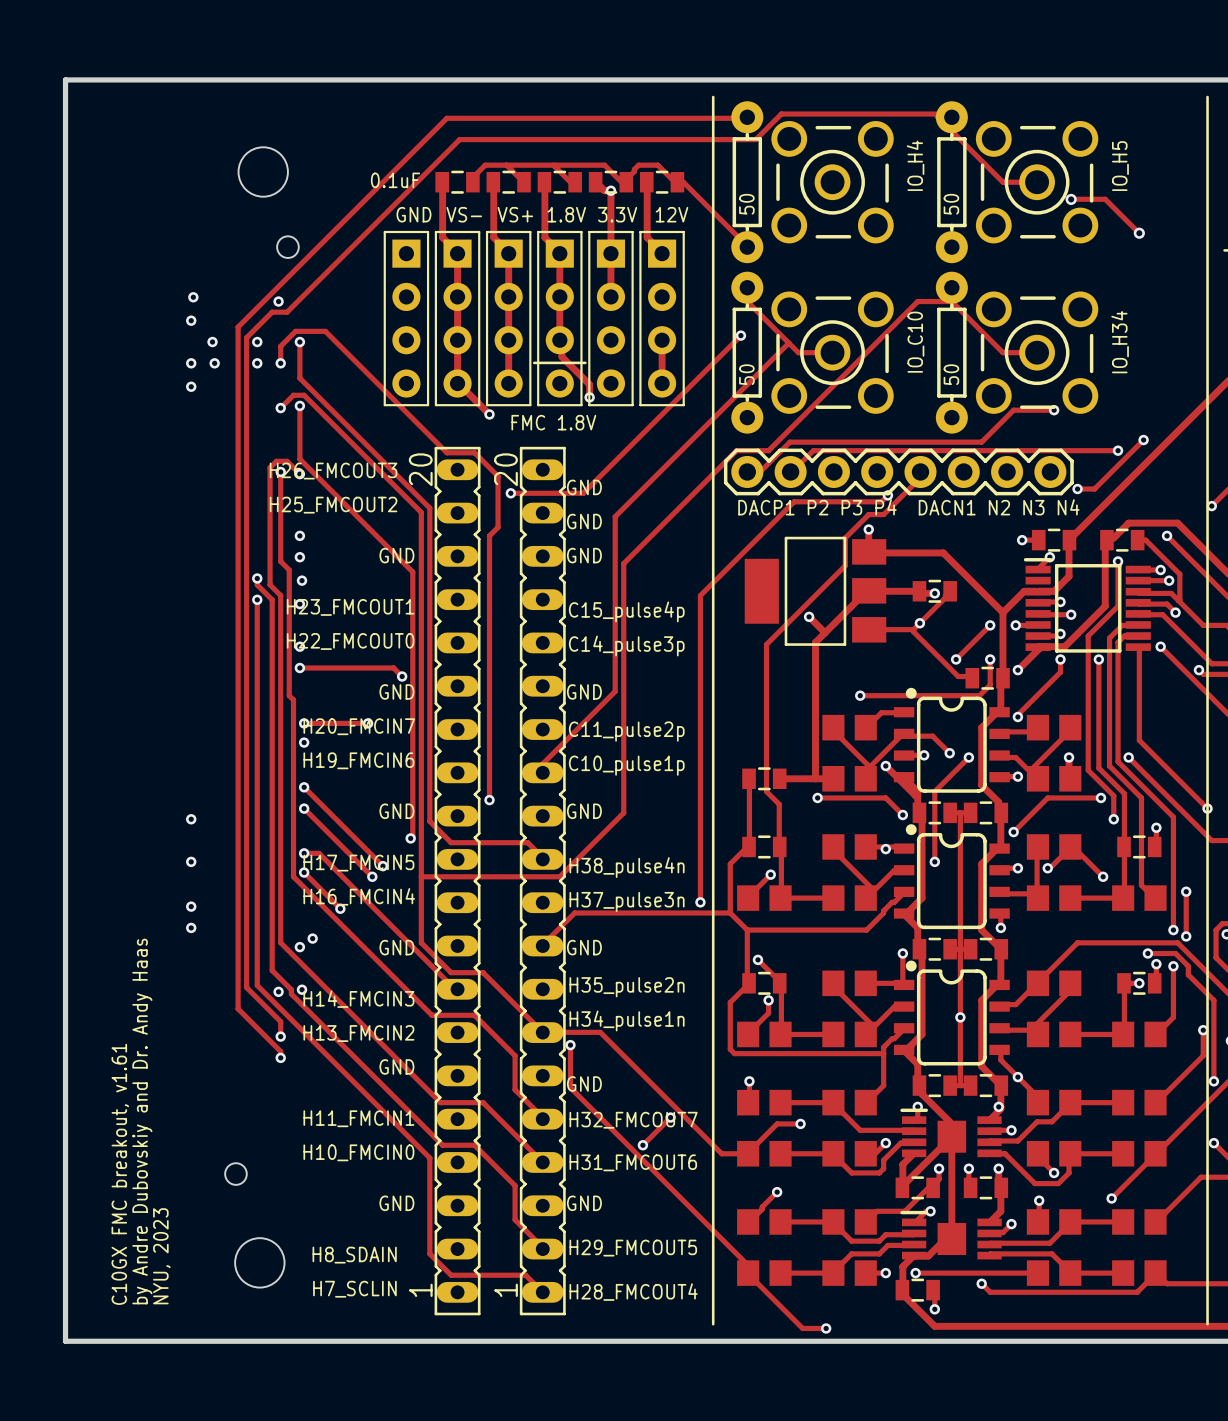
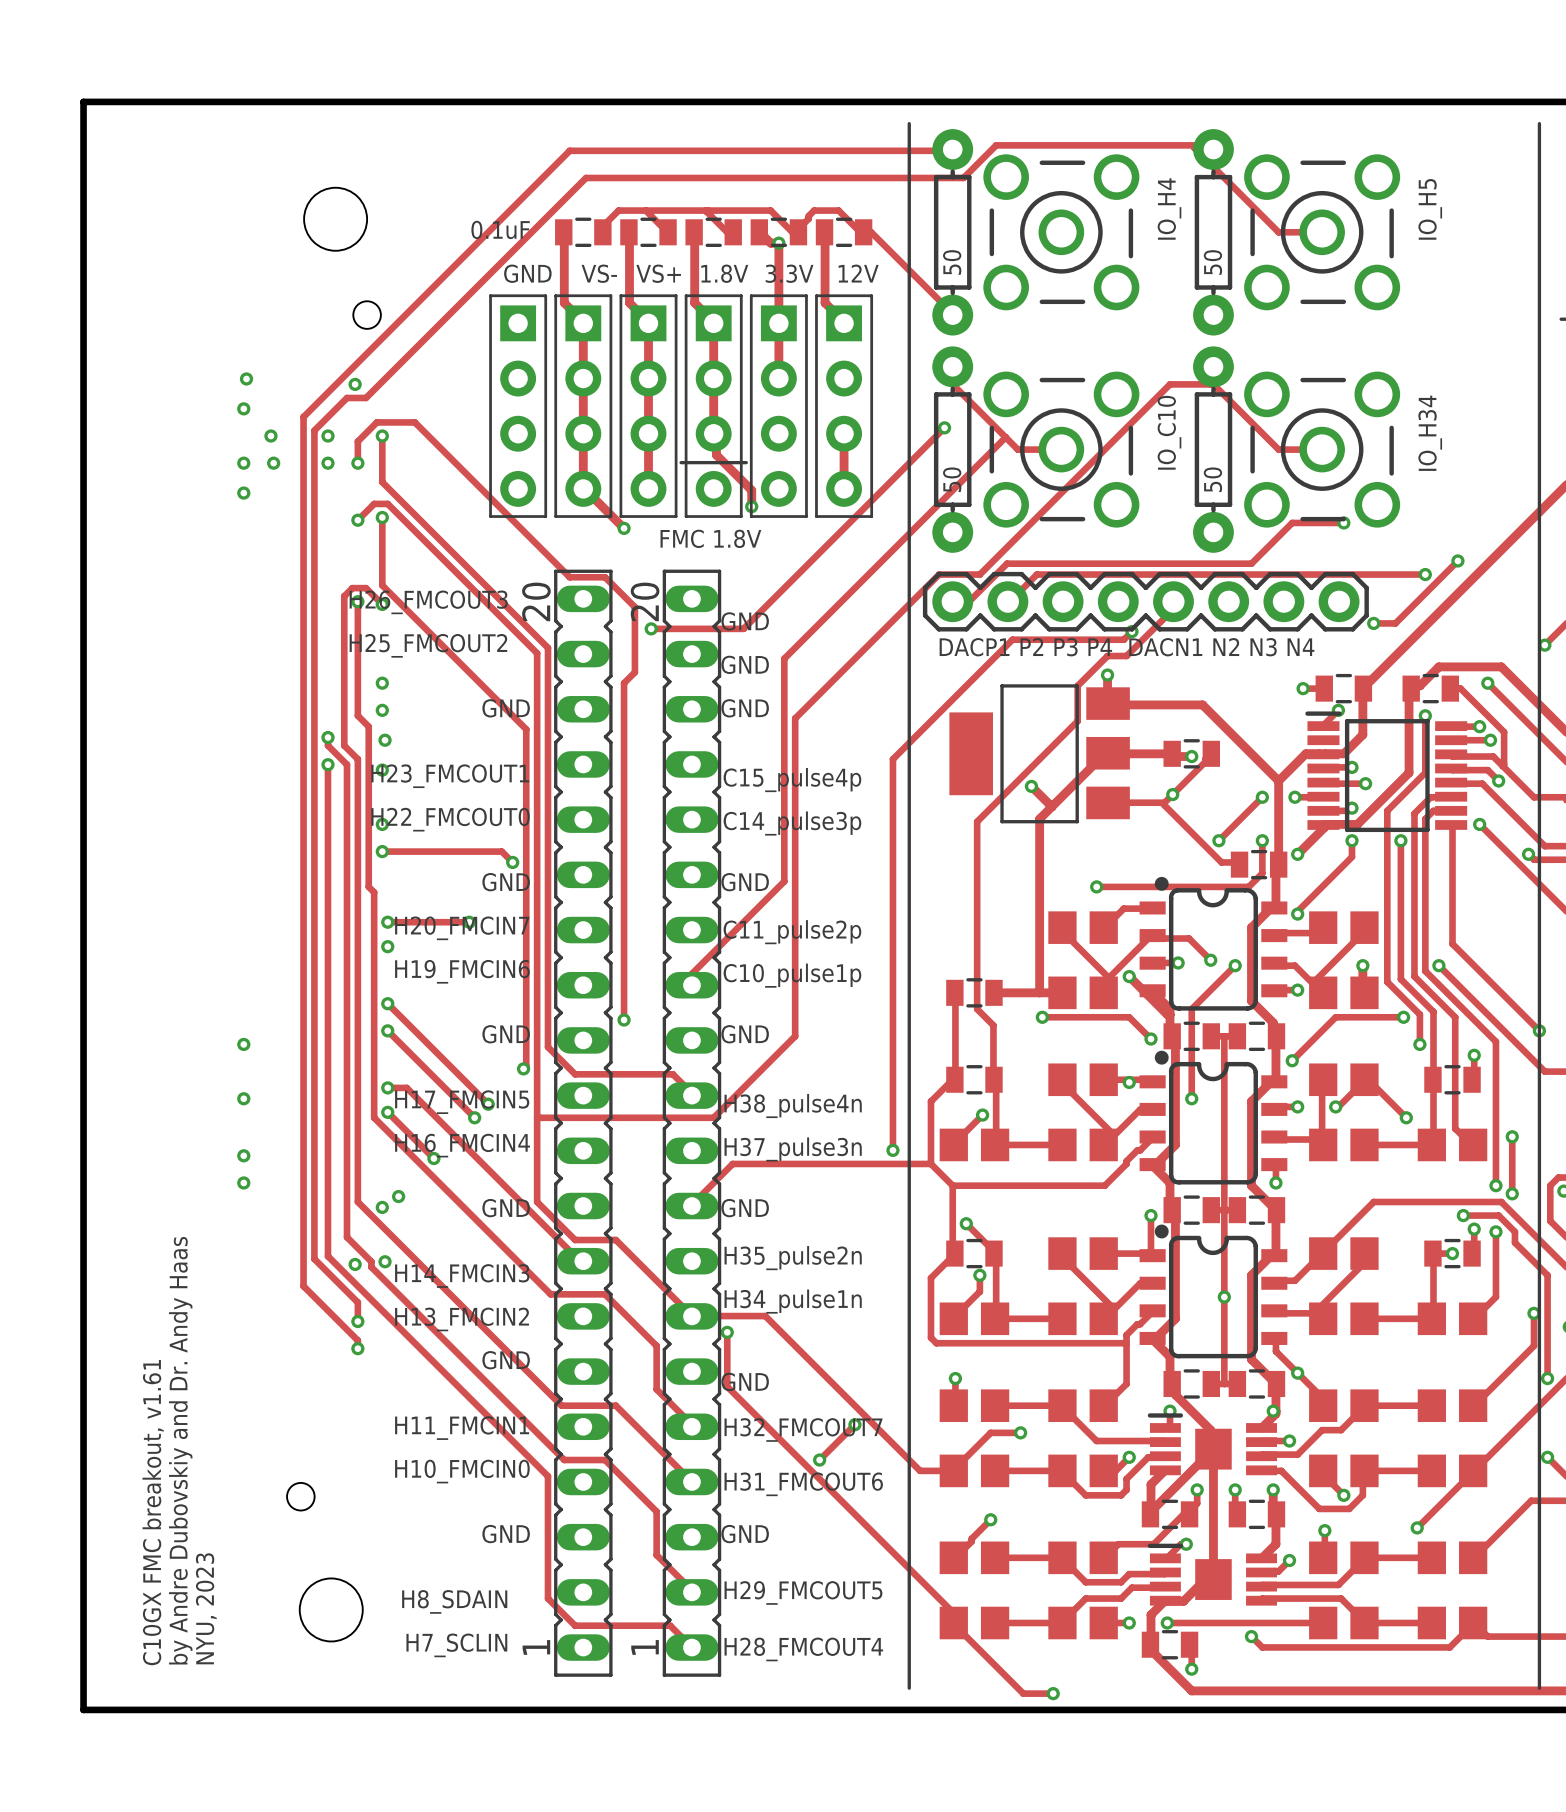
track: (1071, 199) (1105, 199) (1139, 233) -> none
via: (1071, 199) -> none
via: (1139, 233) -> none

